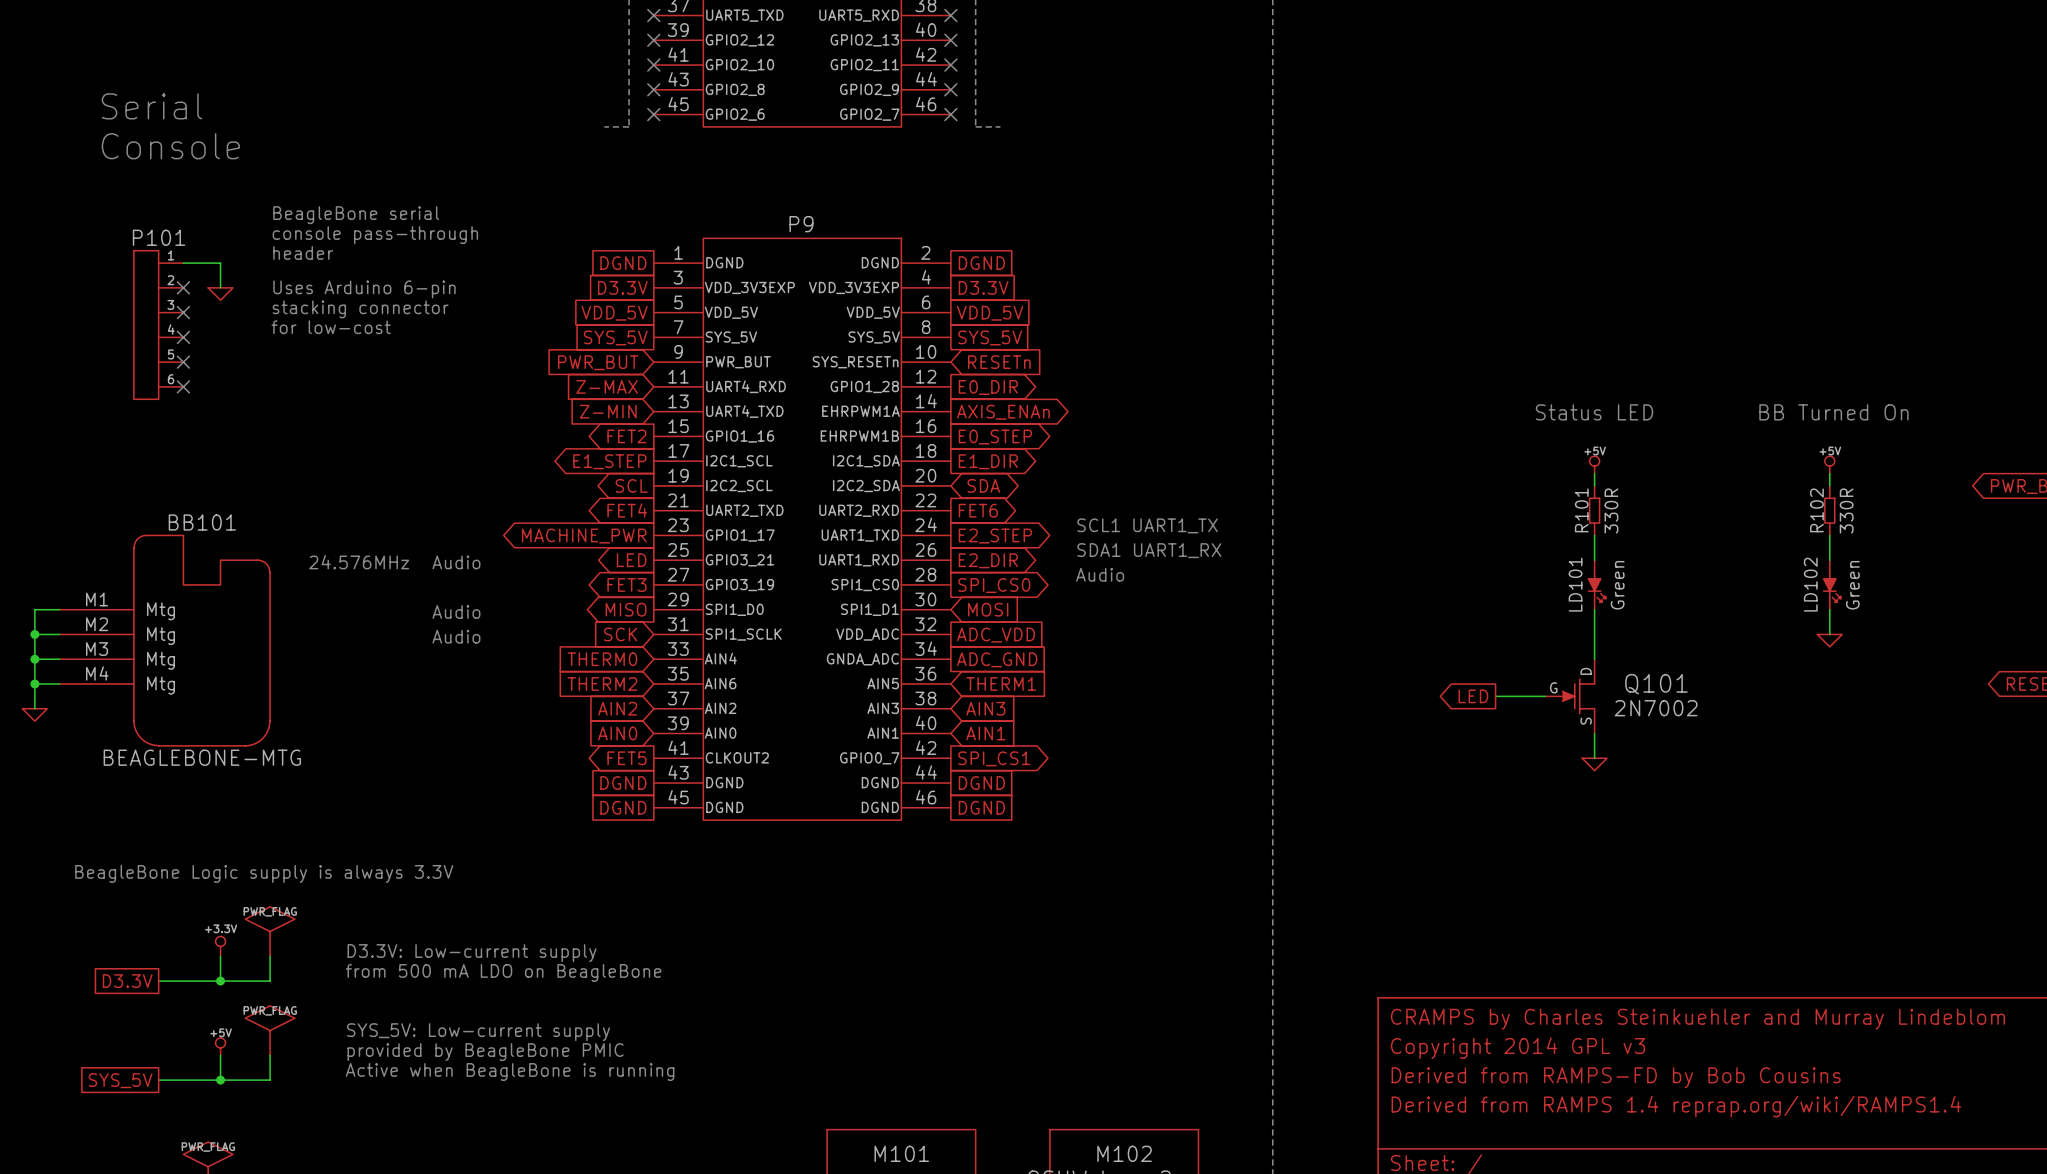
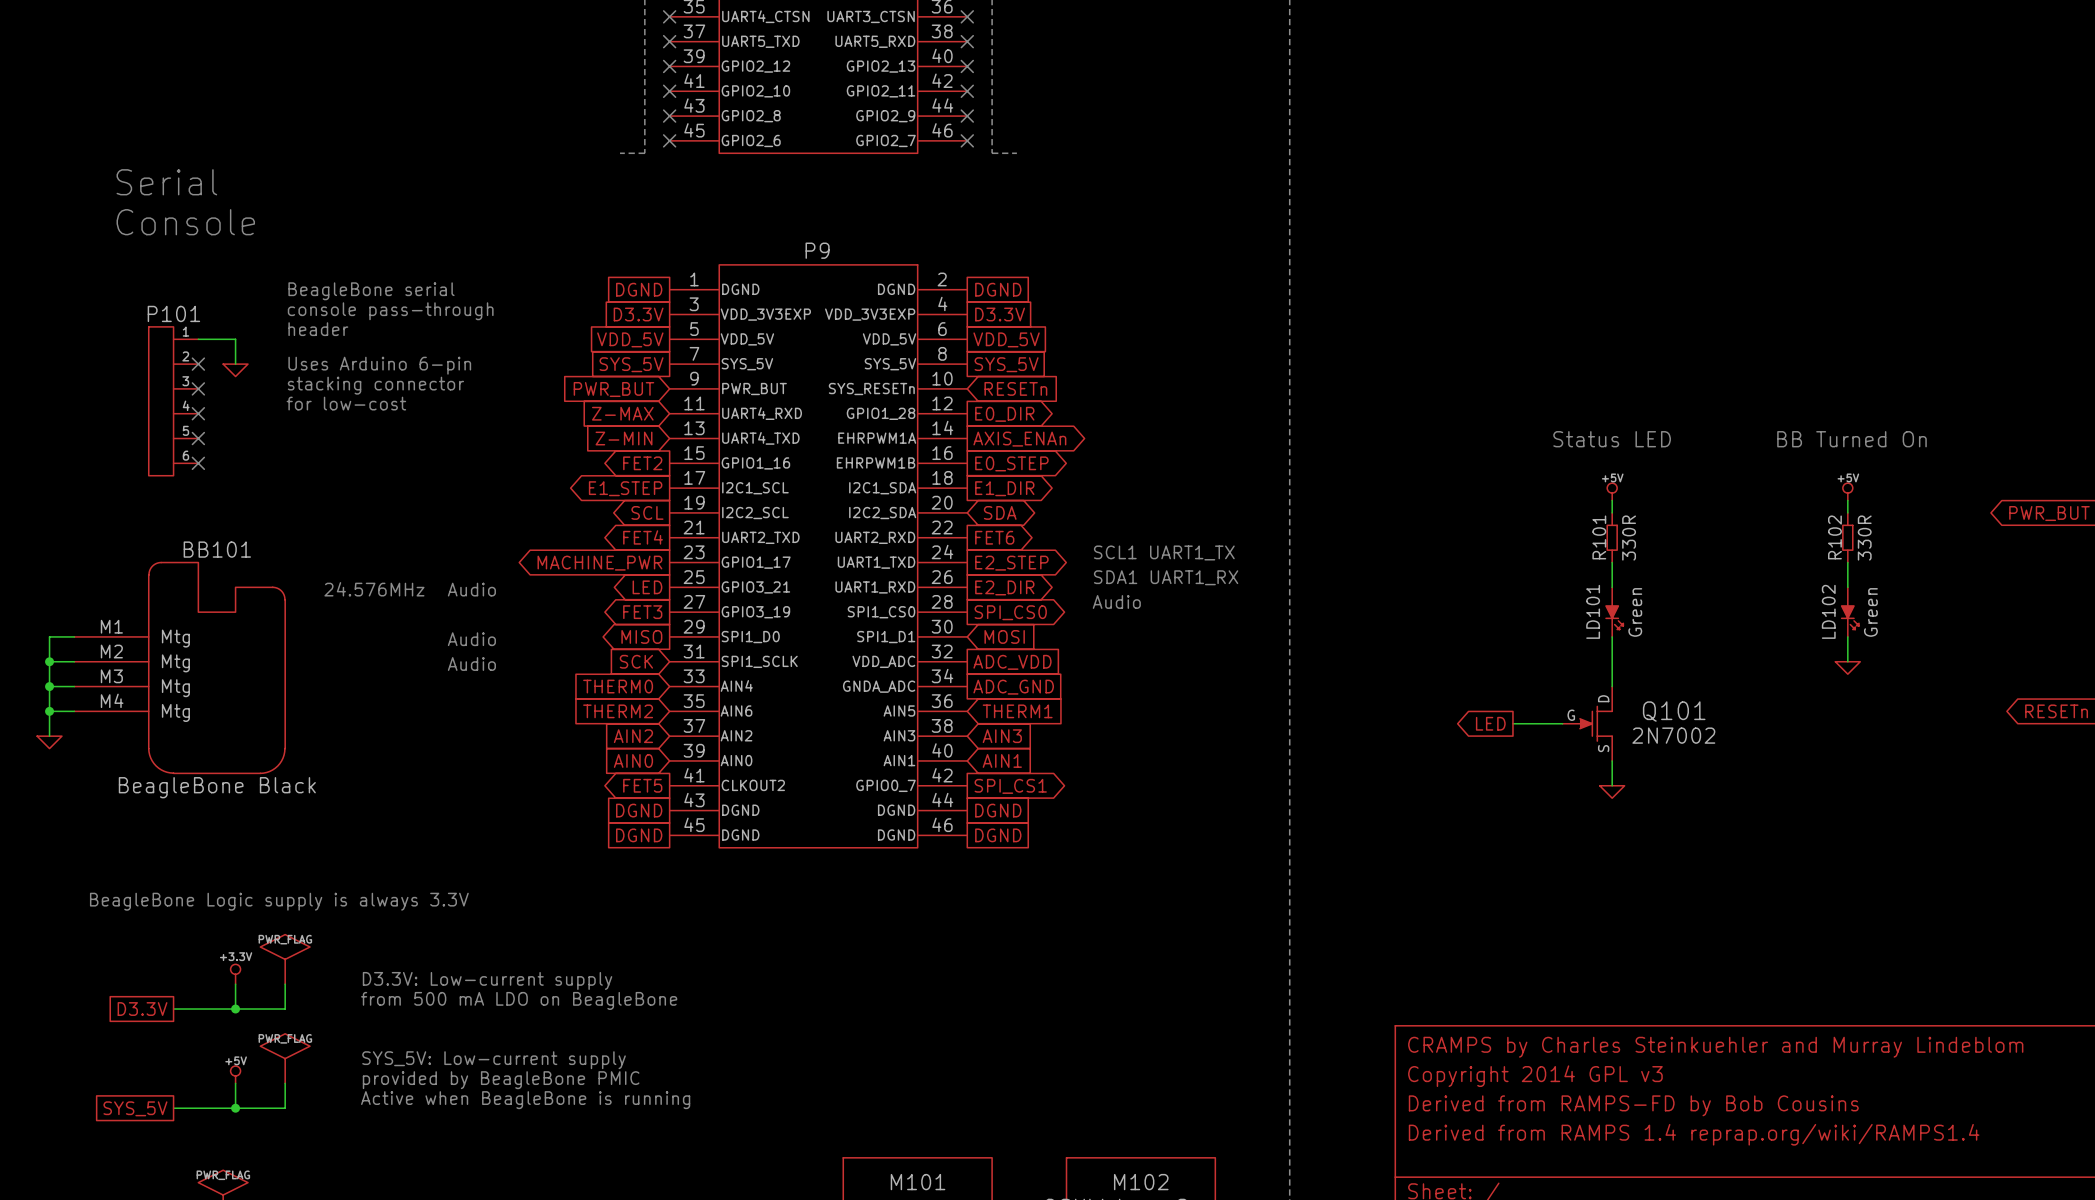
text position: Serial (151, 106) -> Serial (166, 182)
text position: Console (170, 146) -> Console (185, 222)
text position: BeagleBone serial (356, 215) -> BeagleBone serial (371, 291)
text position: console pass-through (375, 235) -> console pass-through (390, 311)
text position: header (303, 252) -> header (318, 329)
wire: (183, 263) (220, 263) (220, 287) -> (198, 339) (235, 339) (235, 364)
no-connect mark: (183, 287) -> none
text position: Uses Arduino 6-pin (364, 289) -> Uses Arduino 6-pin (379, 365)
power symbol position: (220, 294) -> (235, 370)
text position: stacking connector (360, 309) -> stacking connector (375, 385)
no-connect mark: (183, 312) -> none
P101 position: (158, 325) -> (173, 401)
text position: for low-cost (331, 327) -> for low-cost (346, 403)
no-connect mark: none -> (198, 438)
no-connect mark: none -> (198, 463)
BB101 value: BEAGLEBONE-MTG (202, 757) -> BeagleBone Black (217, 787)

